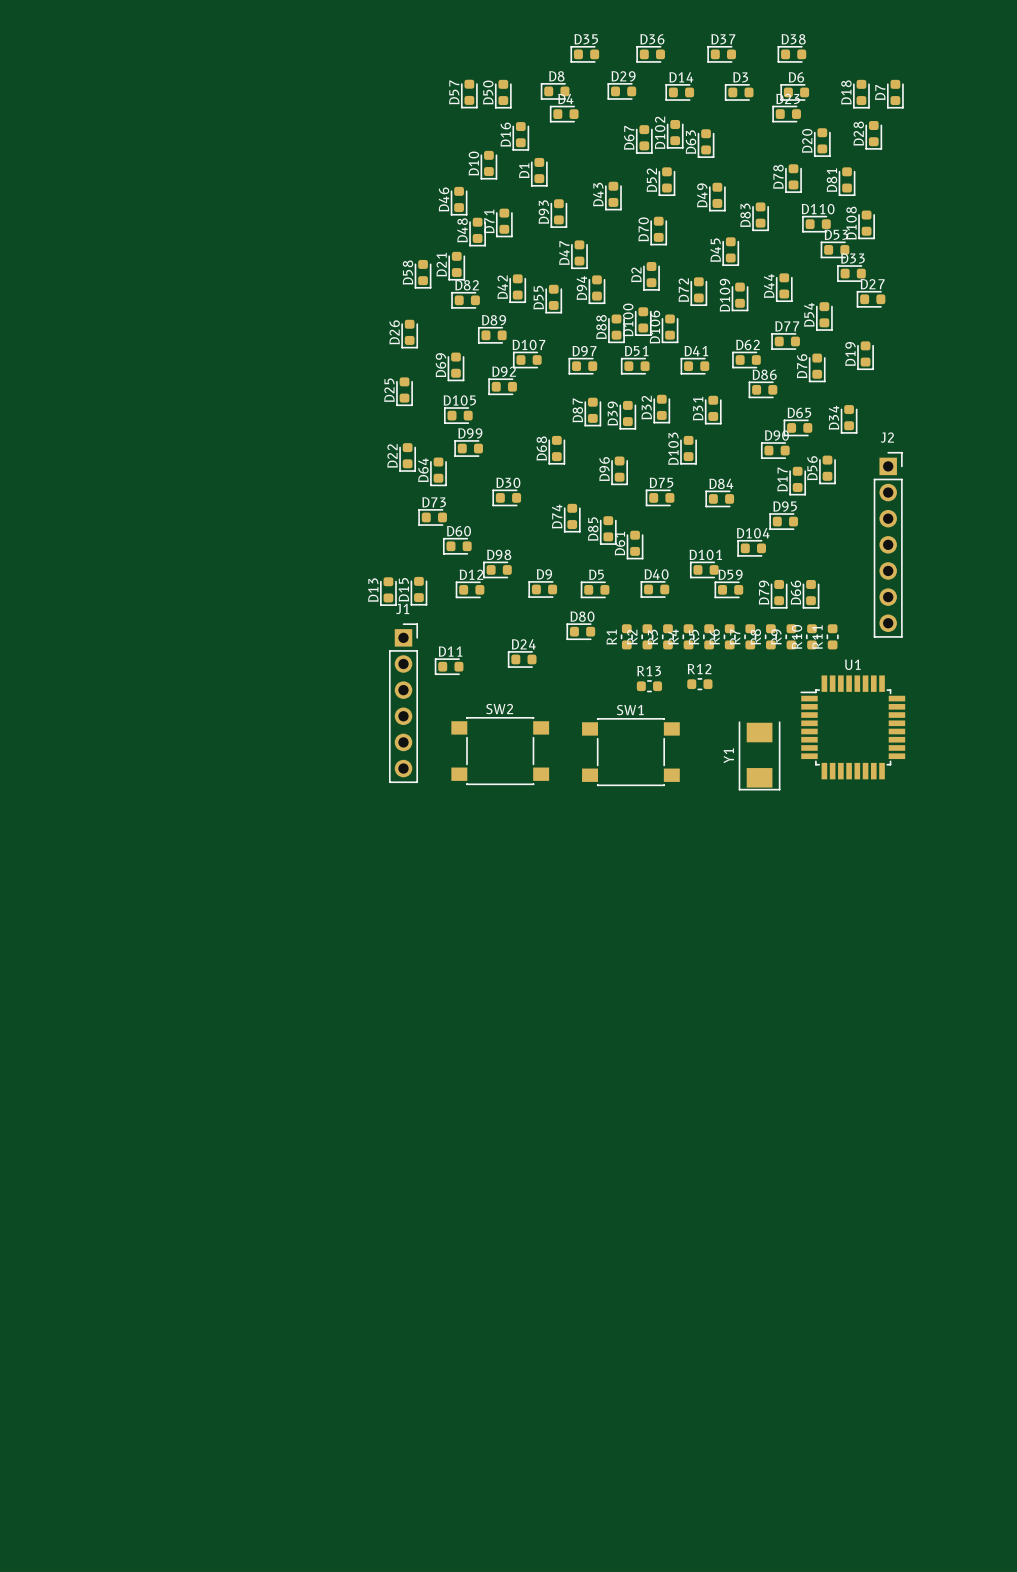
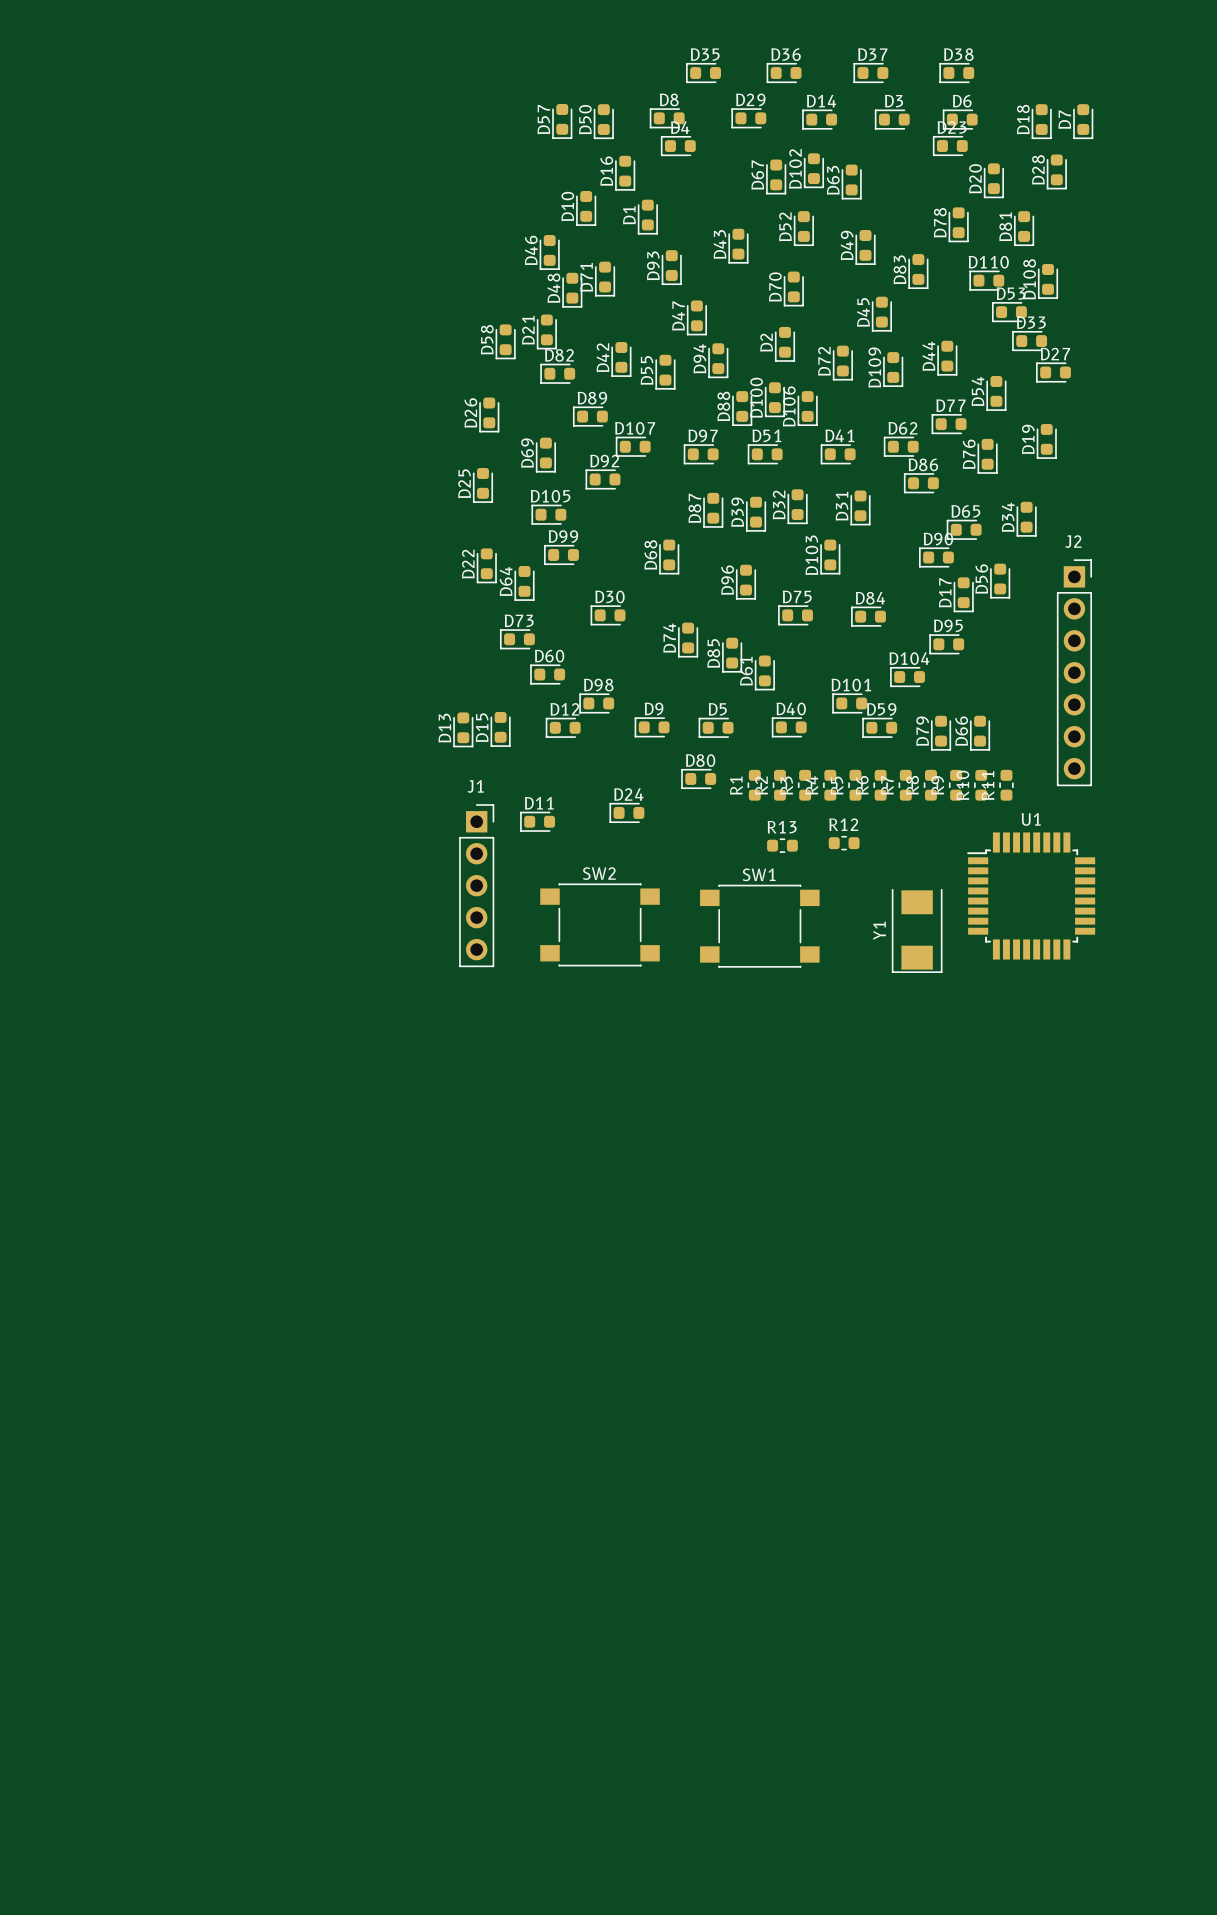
J1 footprint: [389, 623, 418, 783] -> [459, 804, 495, 968]

